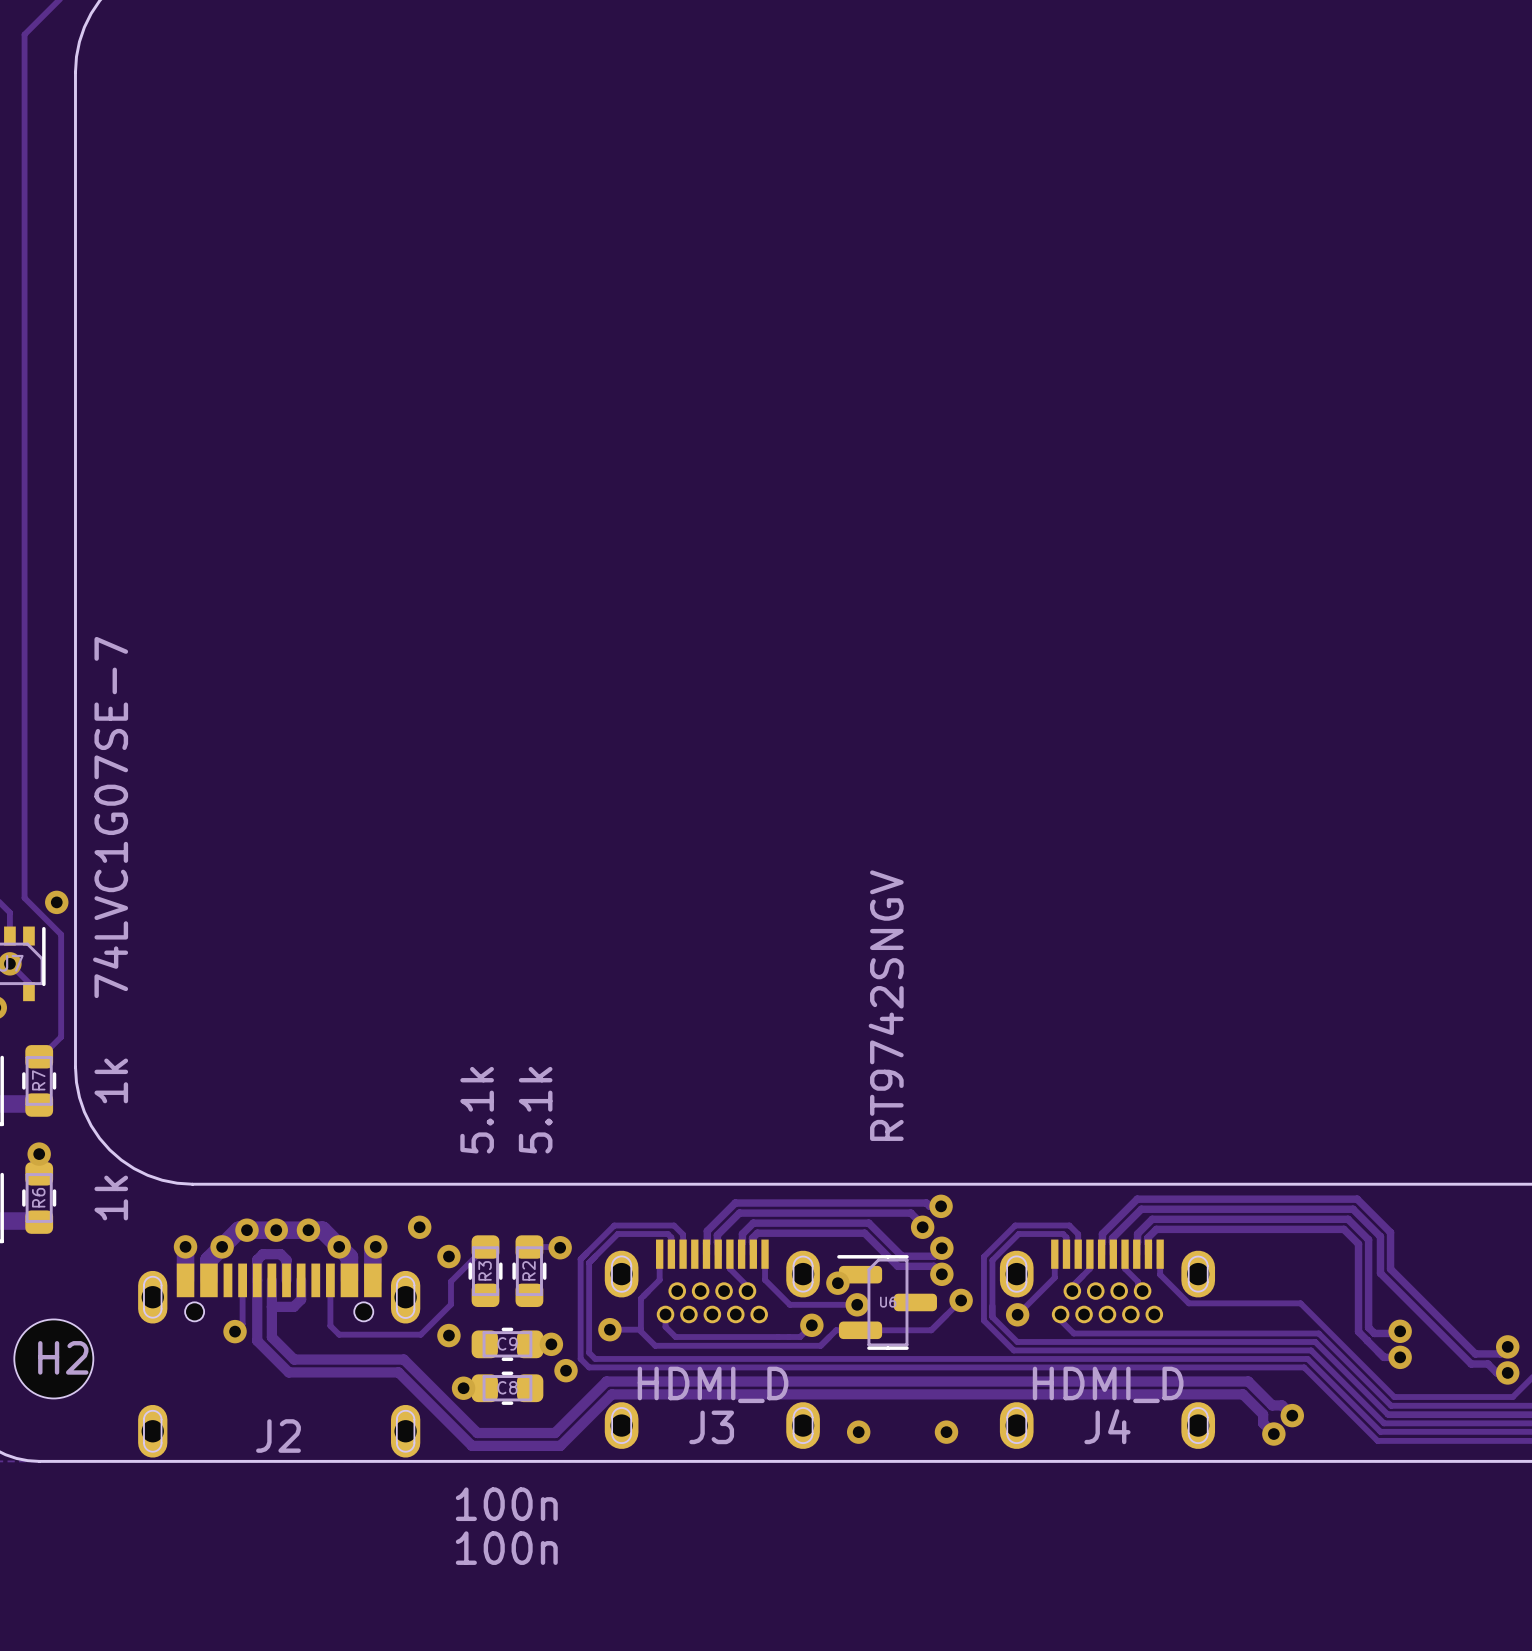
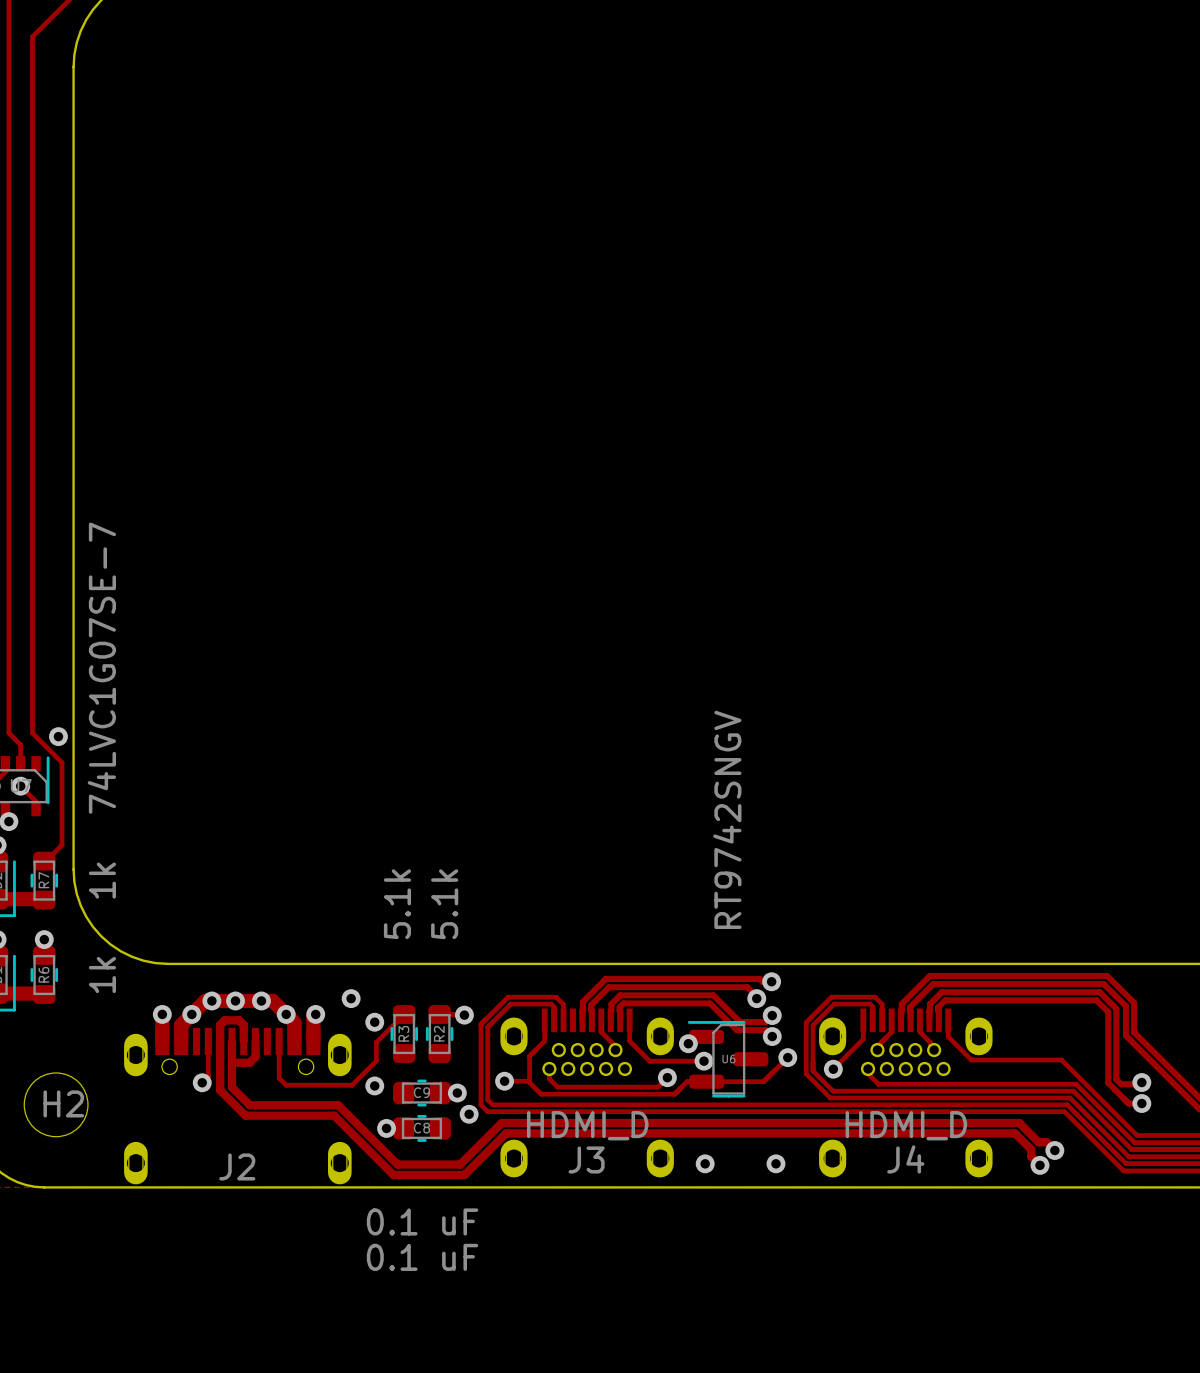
C9 value: 100n (506, 1504) -> 0.1 uF (422, 1221)
C8 value: 100n (506, 1548) -> 0.1 uF (422, 1257)

